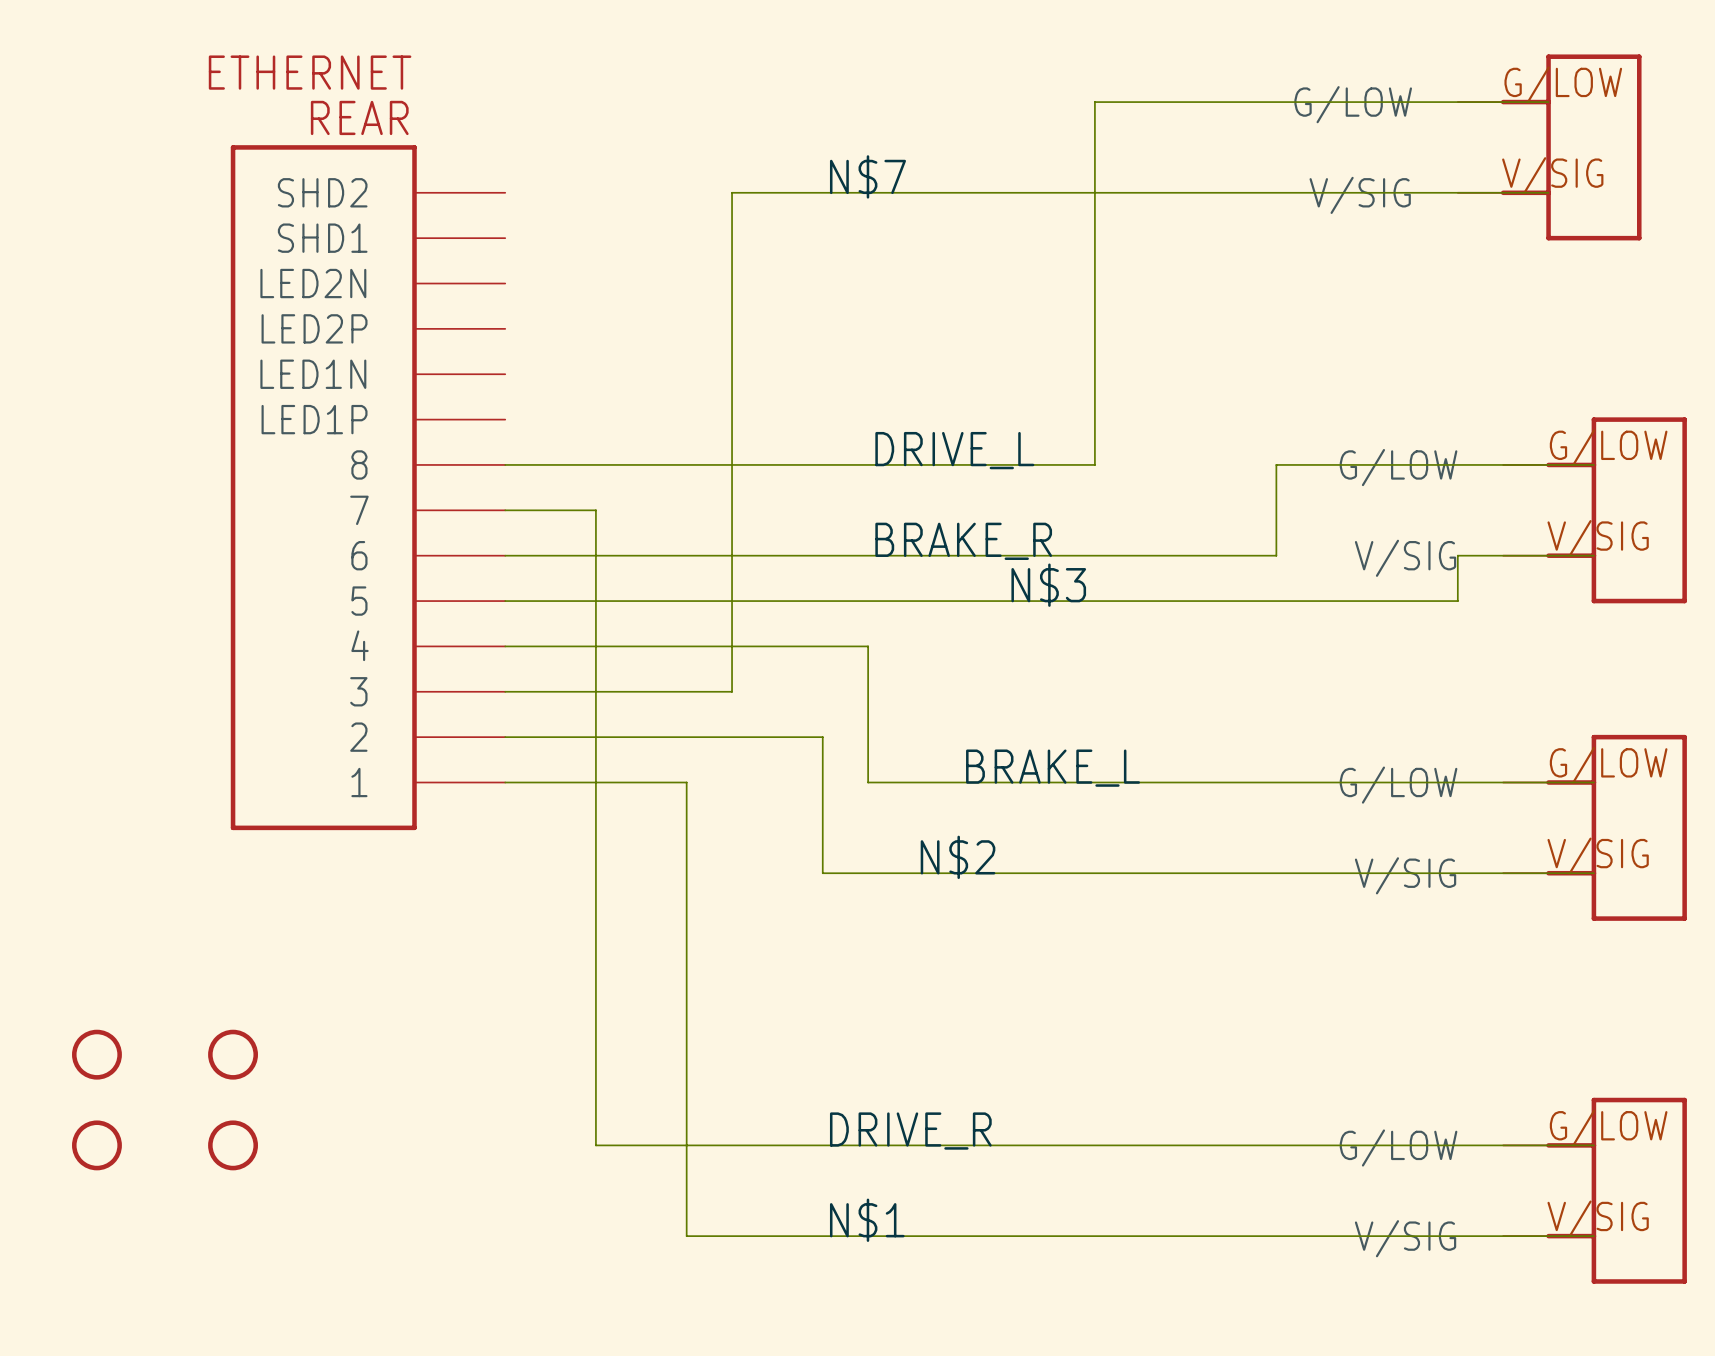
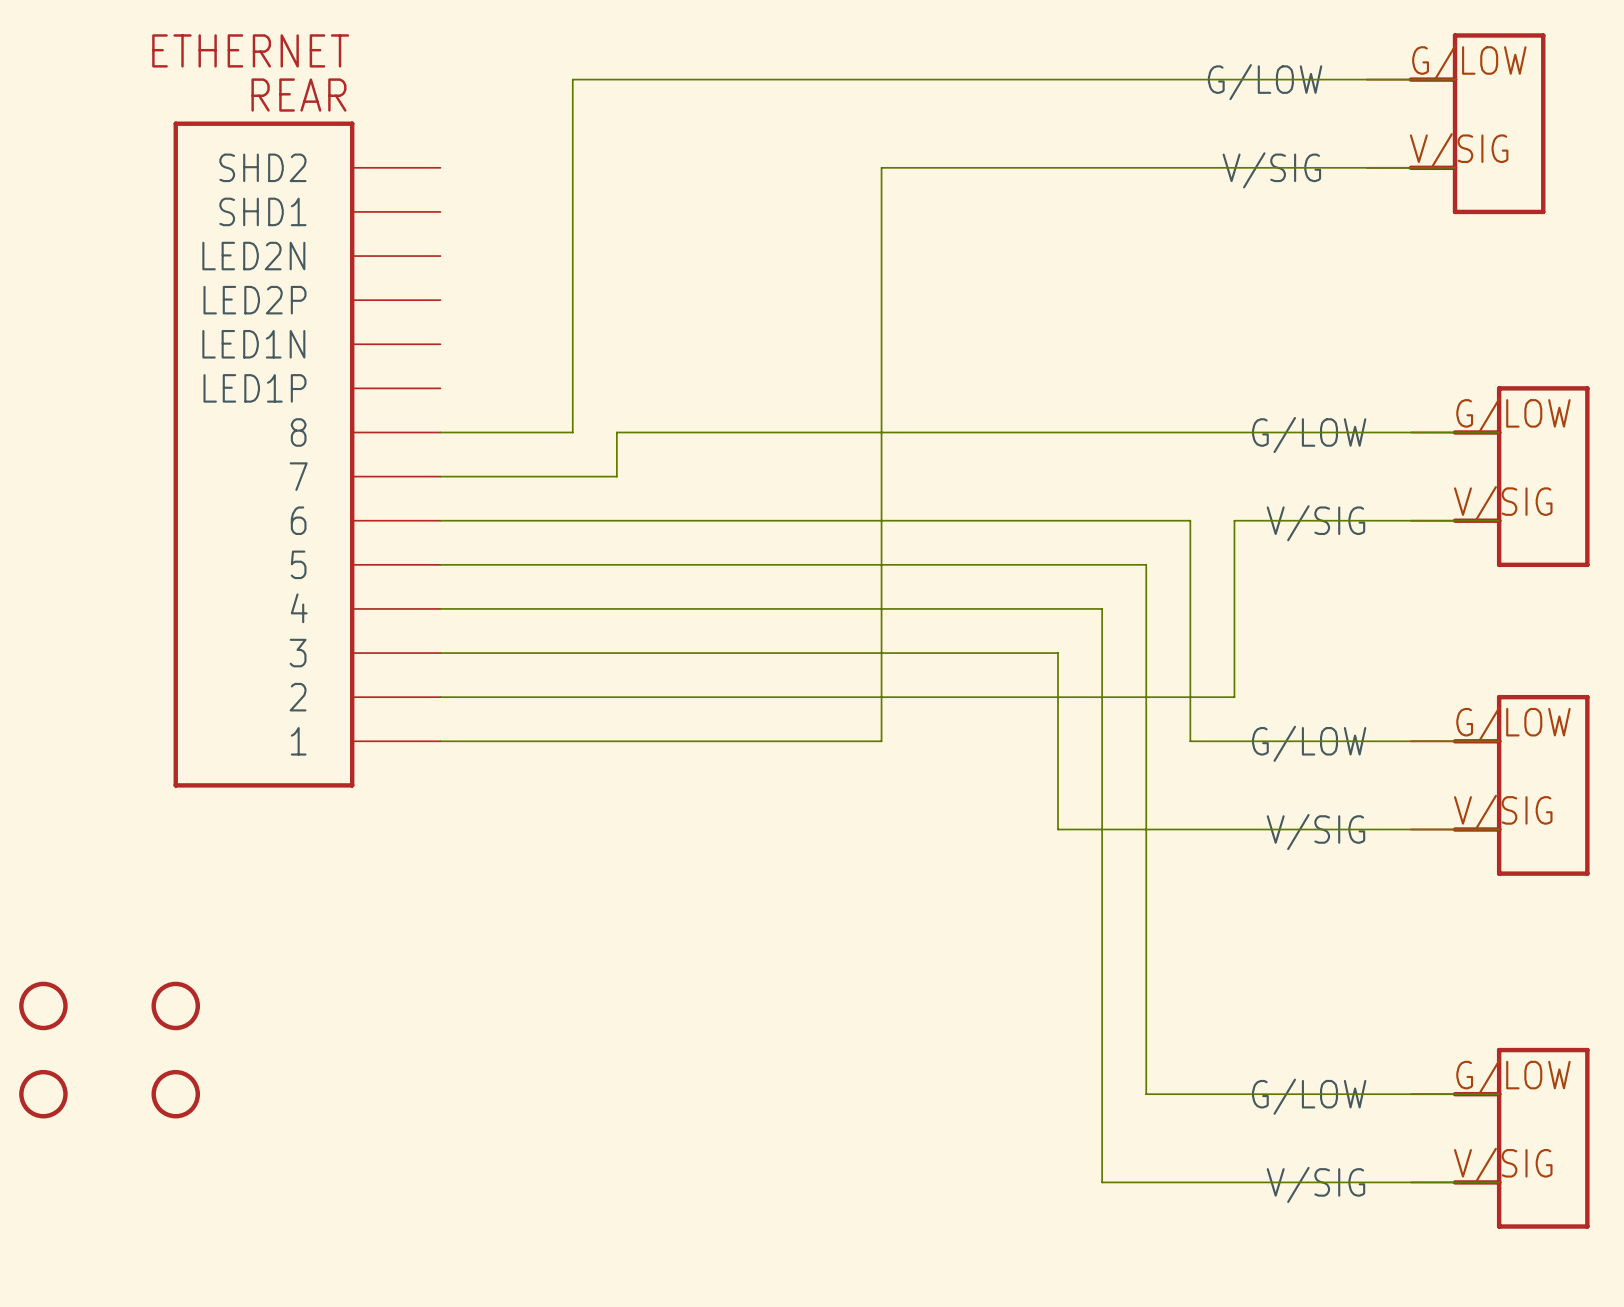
wire: (1094, 102) (1094, 464) -> (1013, 79) (572, 79) (572, 432)
label: N$7 (867, 176) -> none
wire: (958, 192) (732, 192) (732, 691) -> (881, 167) (881, 741)
label: DRIVE_L (954, 450) -> none
wire: (641, 464) (686, 464) -> (528, 476) (616, 476) (616, 432)
wire: (1276, 464) (1276, 555) -> (1190, 432) (1013, 432)
wire: (595, 510) (595, 1145) (1231, 1145) -> (1146, 564) (1146, 1094)
label: BRAKE_R (963, 541) -> none
wire: (1457, 555) (1457, 601) (1231, 601) -> (1366, 520) (1234, 520) (1234, 697) (749, 697)
label: N$3 (1048, 585) -> none
wire: (868, 646) (868, 782) -> (616, 741) (793, 741)
wire: (822, 737) (822, 873) (1140, 873) -> (660, 653) (1058, 653) (1058, 829)
label: BRAKE_L (1053, 768) -> none
wire: (686, 782) (686, 1236) (1185, 1236) -> (793, 608) (1102, 608) (1102, 1182)
wire: (958, 782) (1276, 782) -> (1190, 520) (1190, 741)
label: N$2 (958, 857) -> none
label: DRIVE_R (910, 1131) -> none
label: N$1 (867, 1220) -> none

